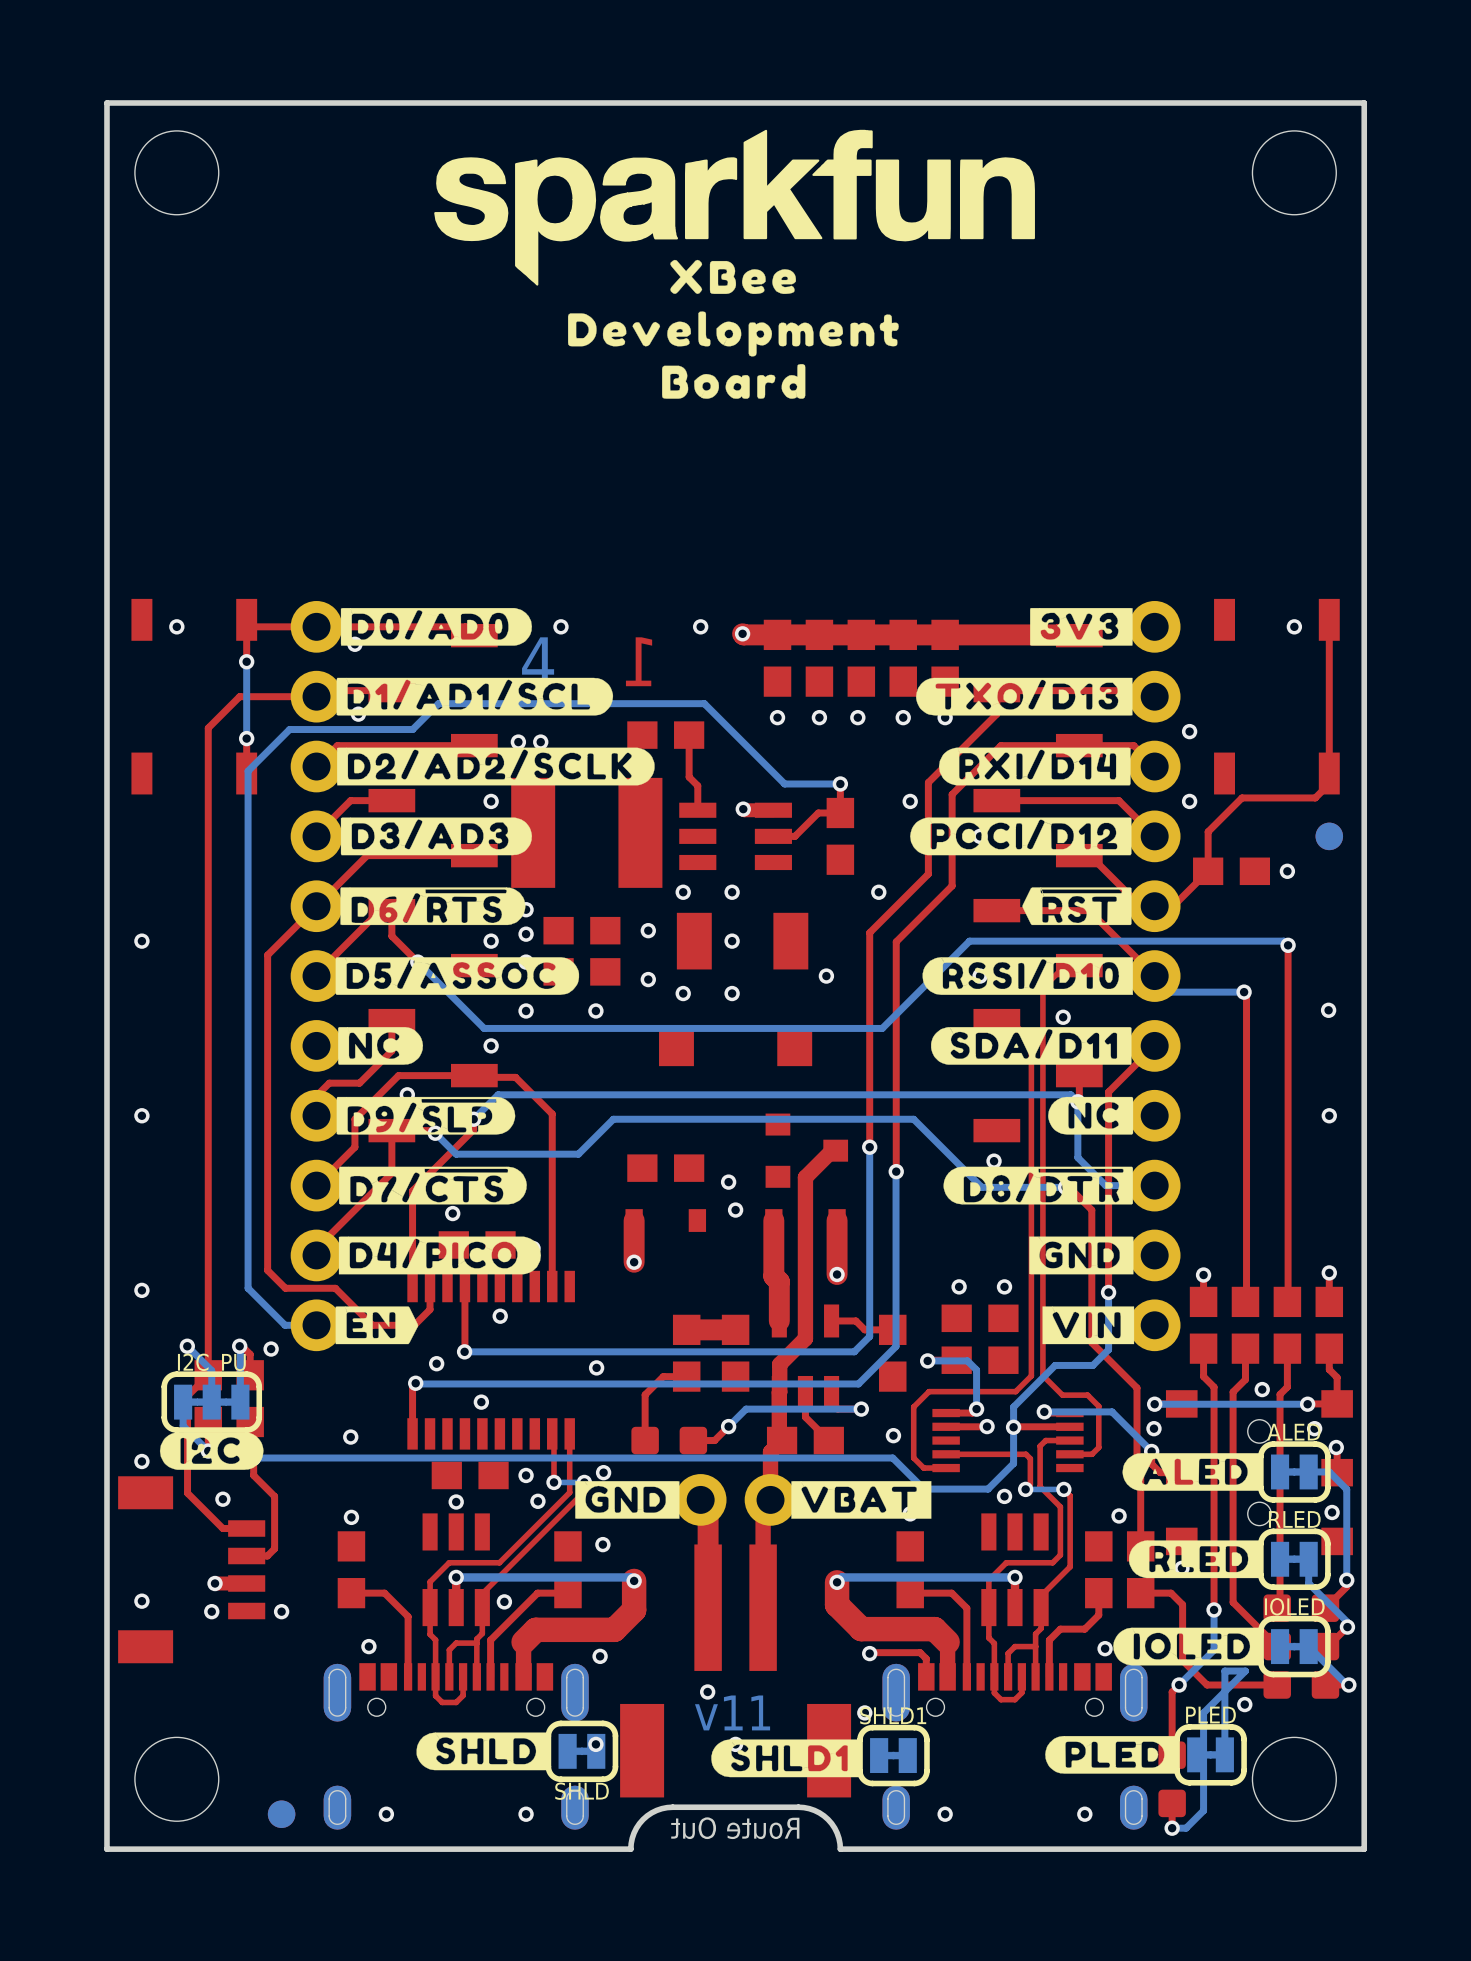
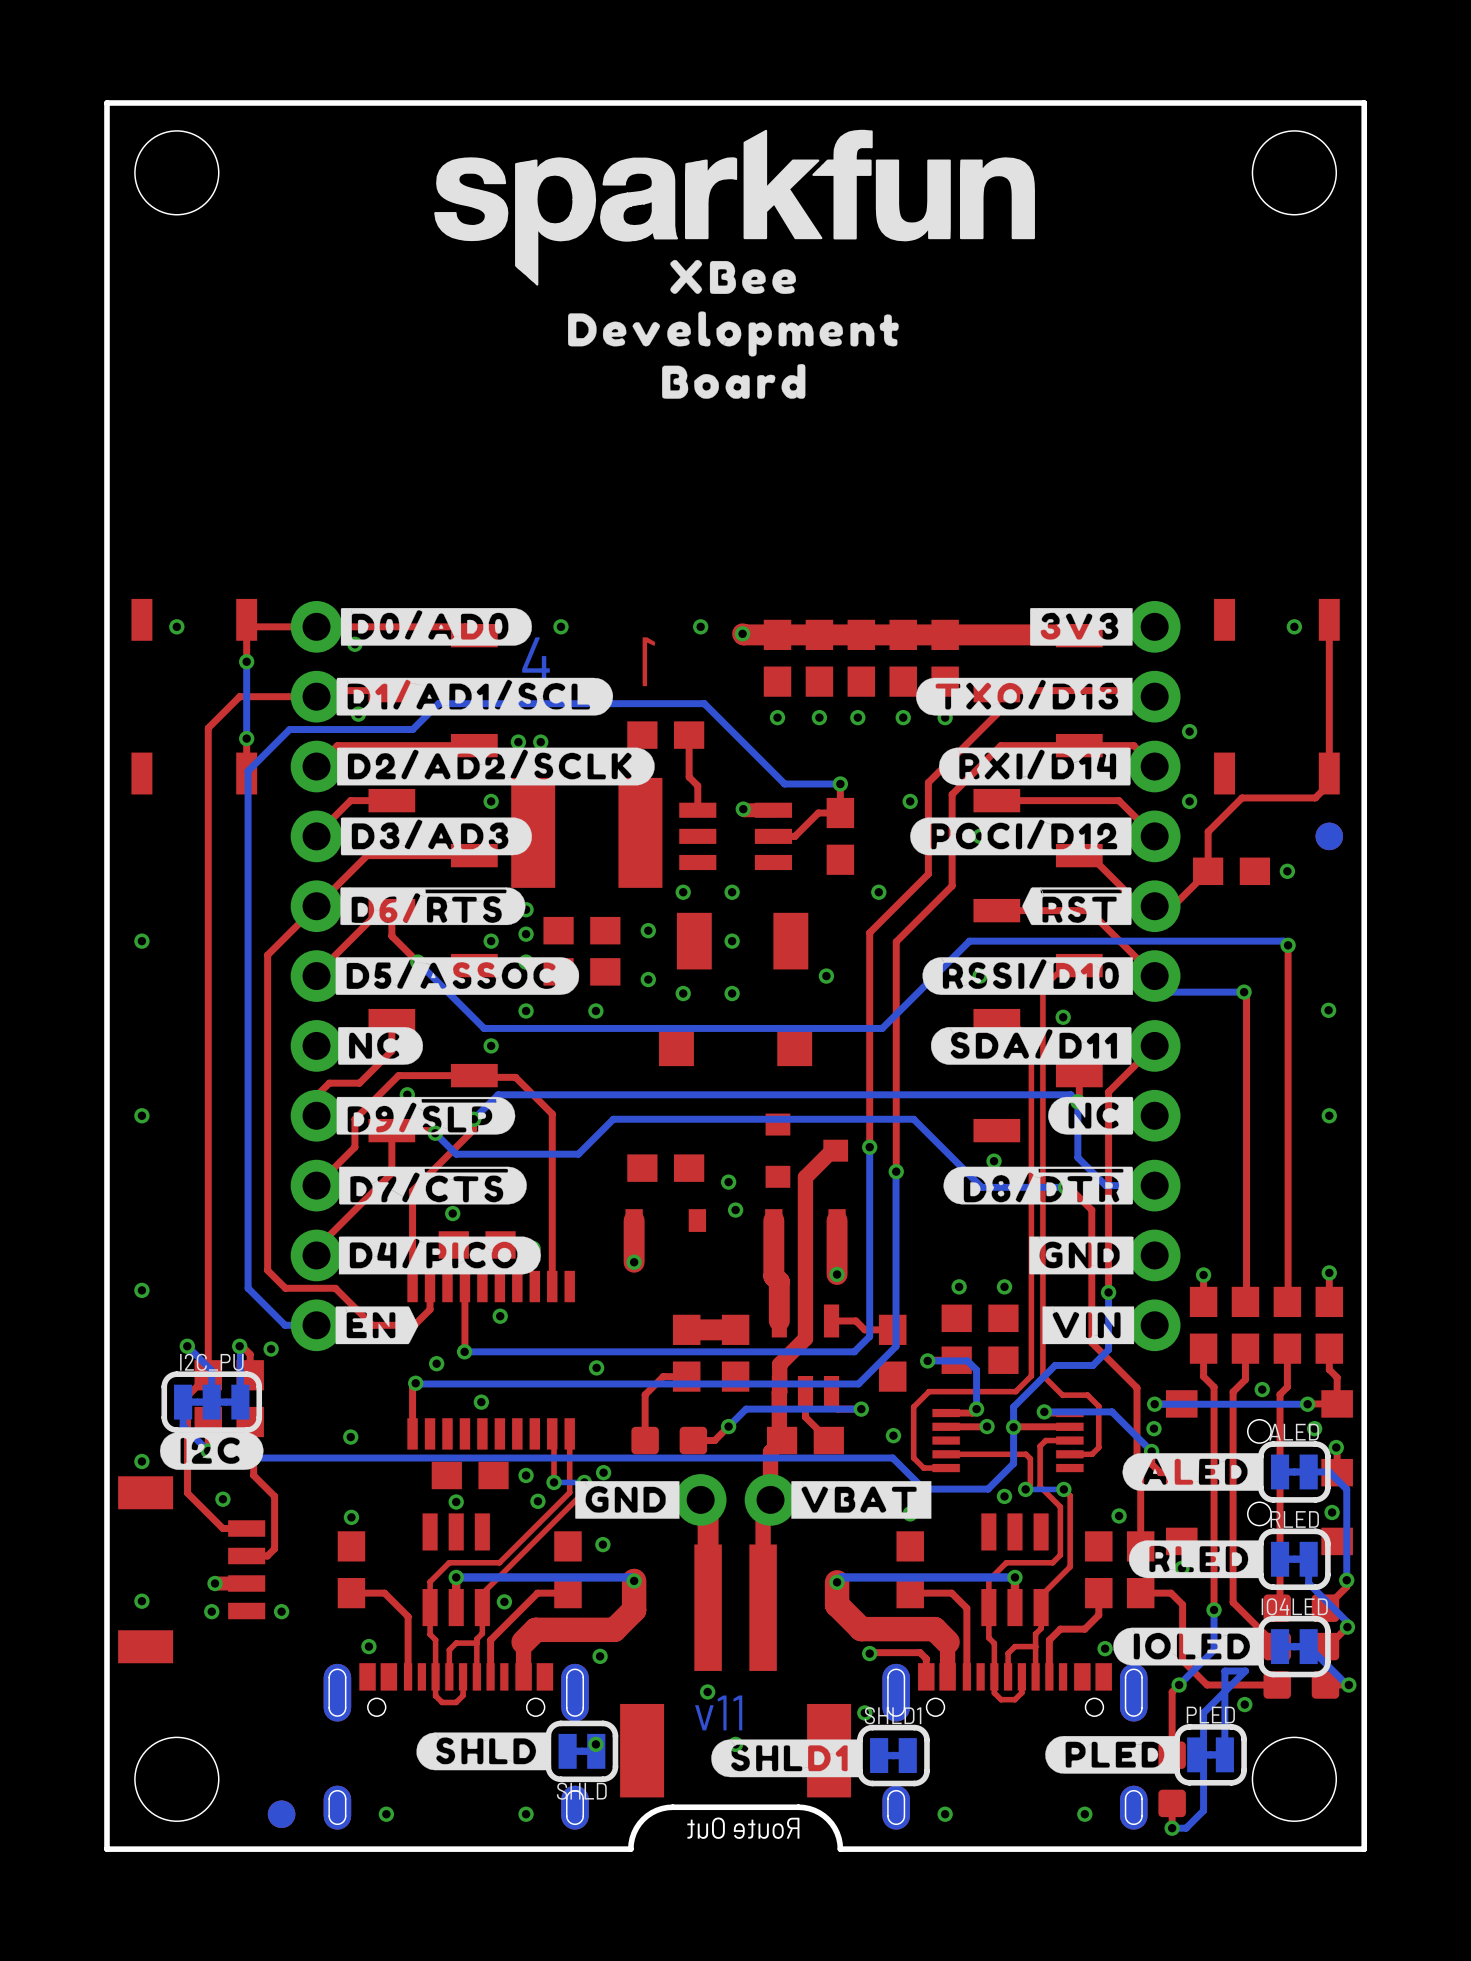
IOLED name: IOLED (1294, 1606) -> IO4LED (1294, 1606)

